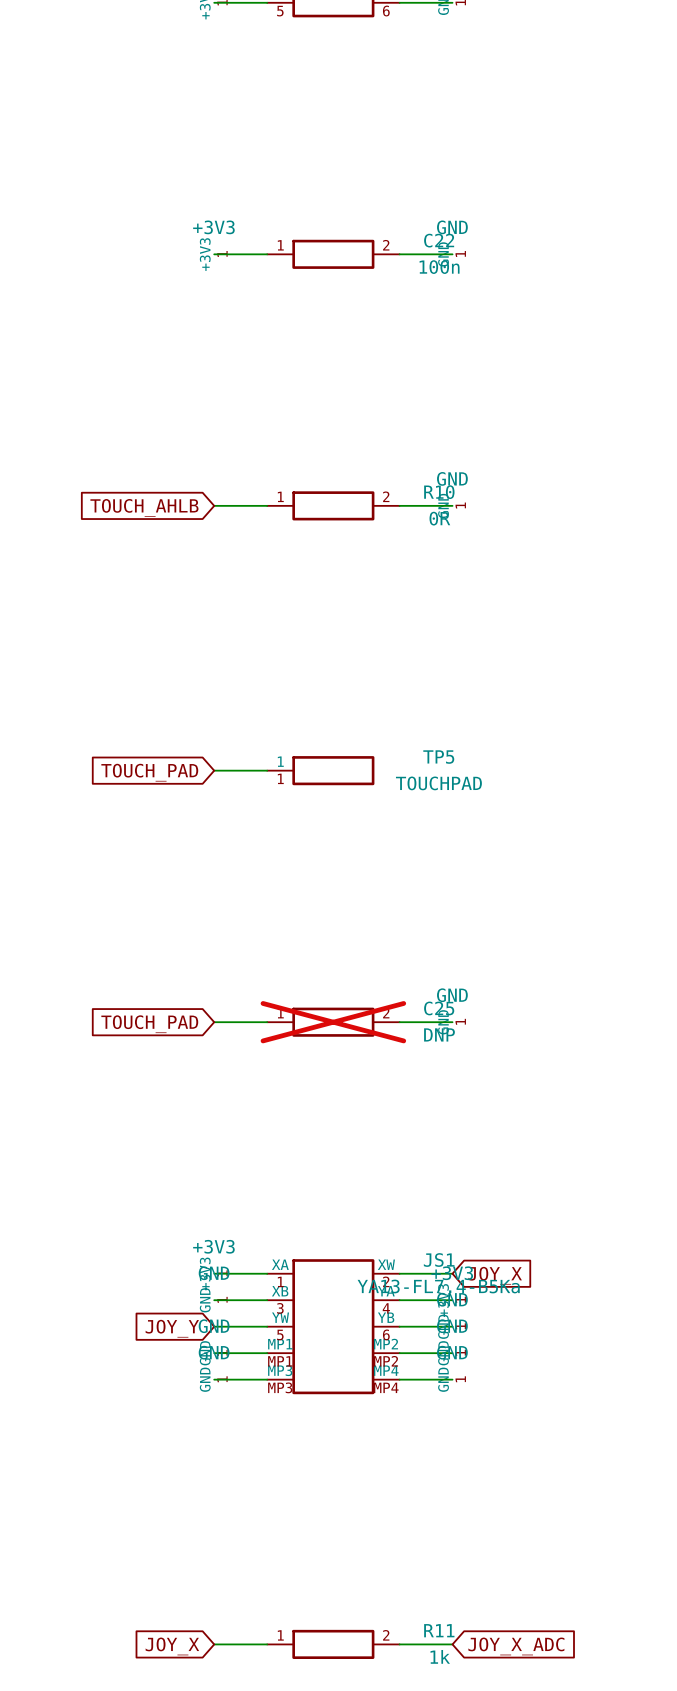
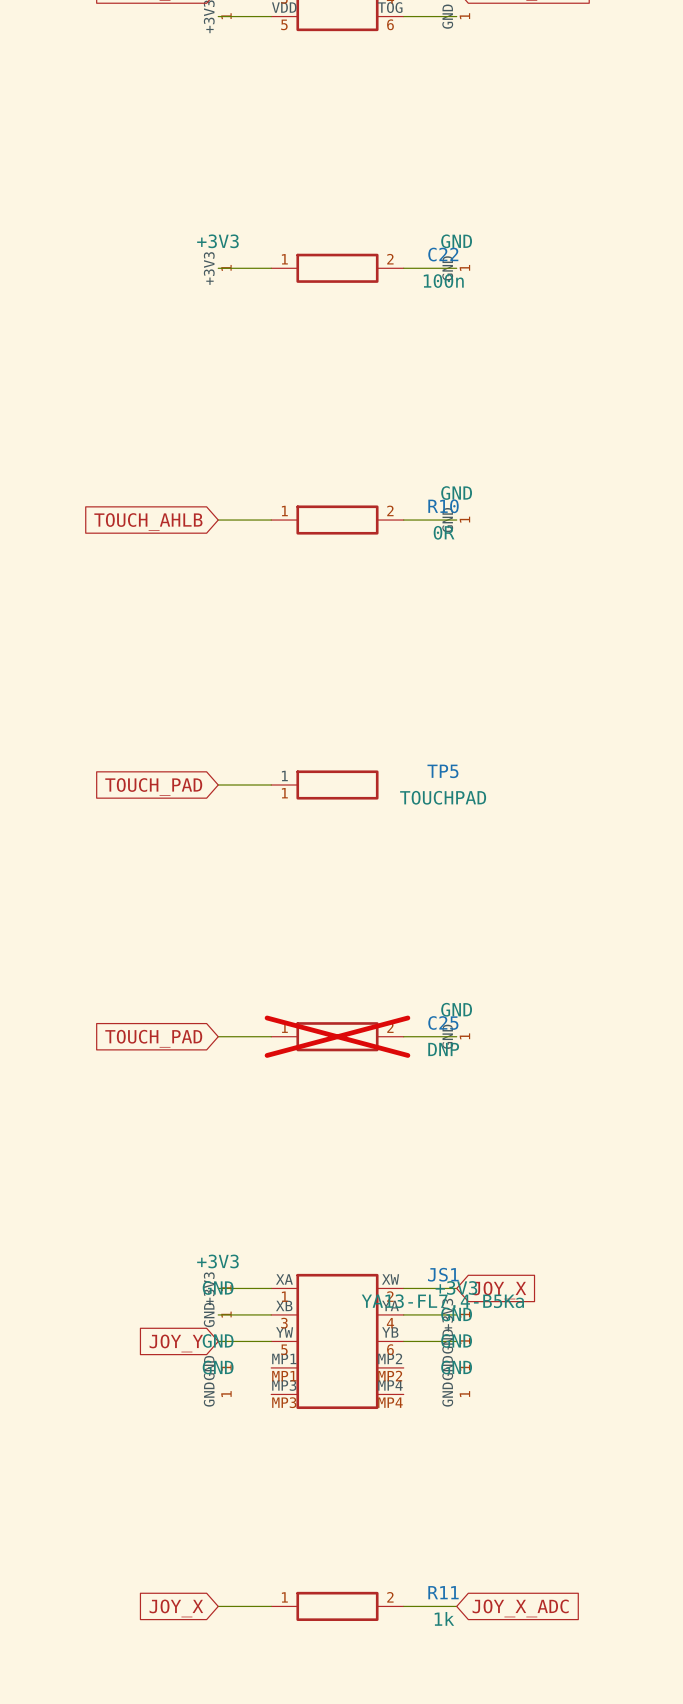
wire: (214, 1353) (267, 1353) -> none
wire: (399, 1353) (452, 1353) -> none
wire: (214, 1379) (267, 1379) -> none
wire: (399, 1379) (452, 1379) -> none
wire: (214, 1644) (267, 1644) -> (218, 1606) (271, 1606)
R11 position: (333, 1644) -> (337, 1606)
wire: (399, 1644) (452, 1644) -> (403, 1606) (456, 1606)
global label position: JOY_X (172, 1646) -> JOY_X (176, 1608)
global label position: JOY_X_ADC (516, 1646) -> JOY_X_ADC (520, 1608)

